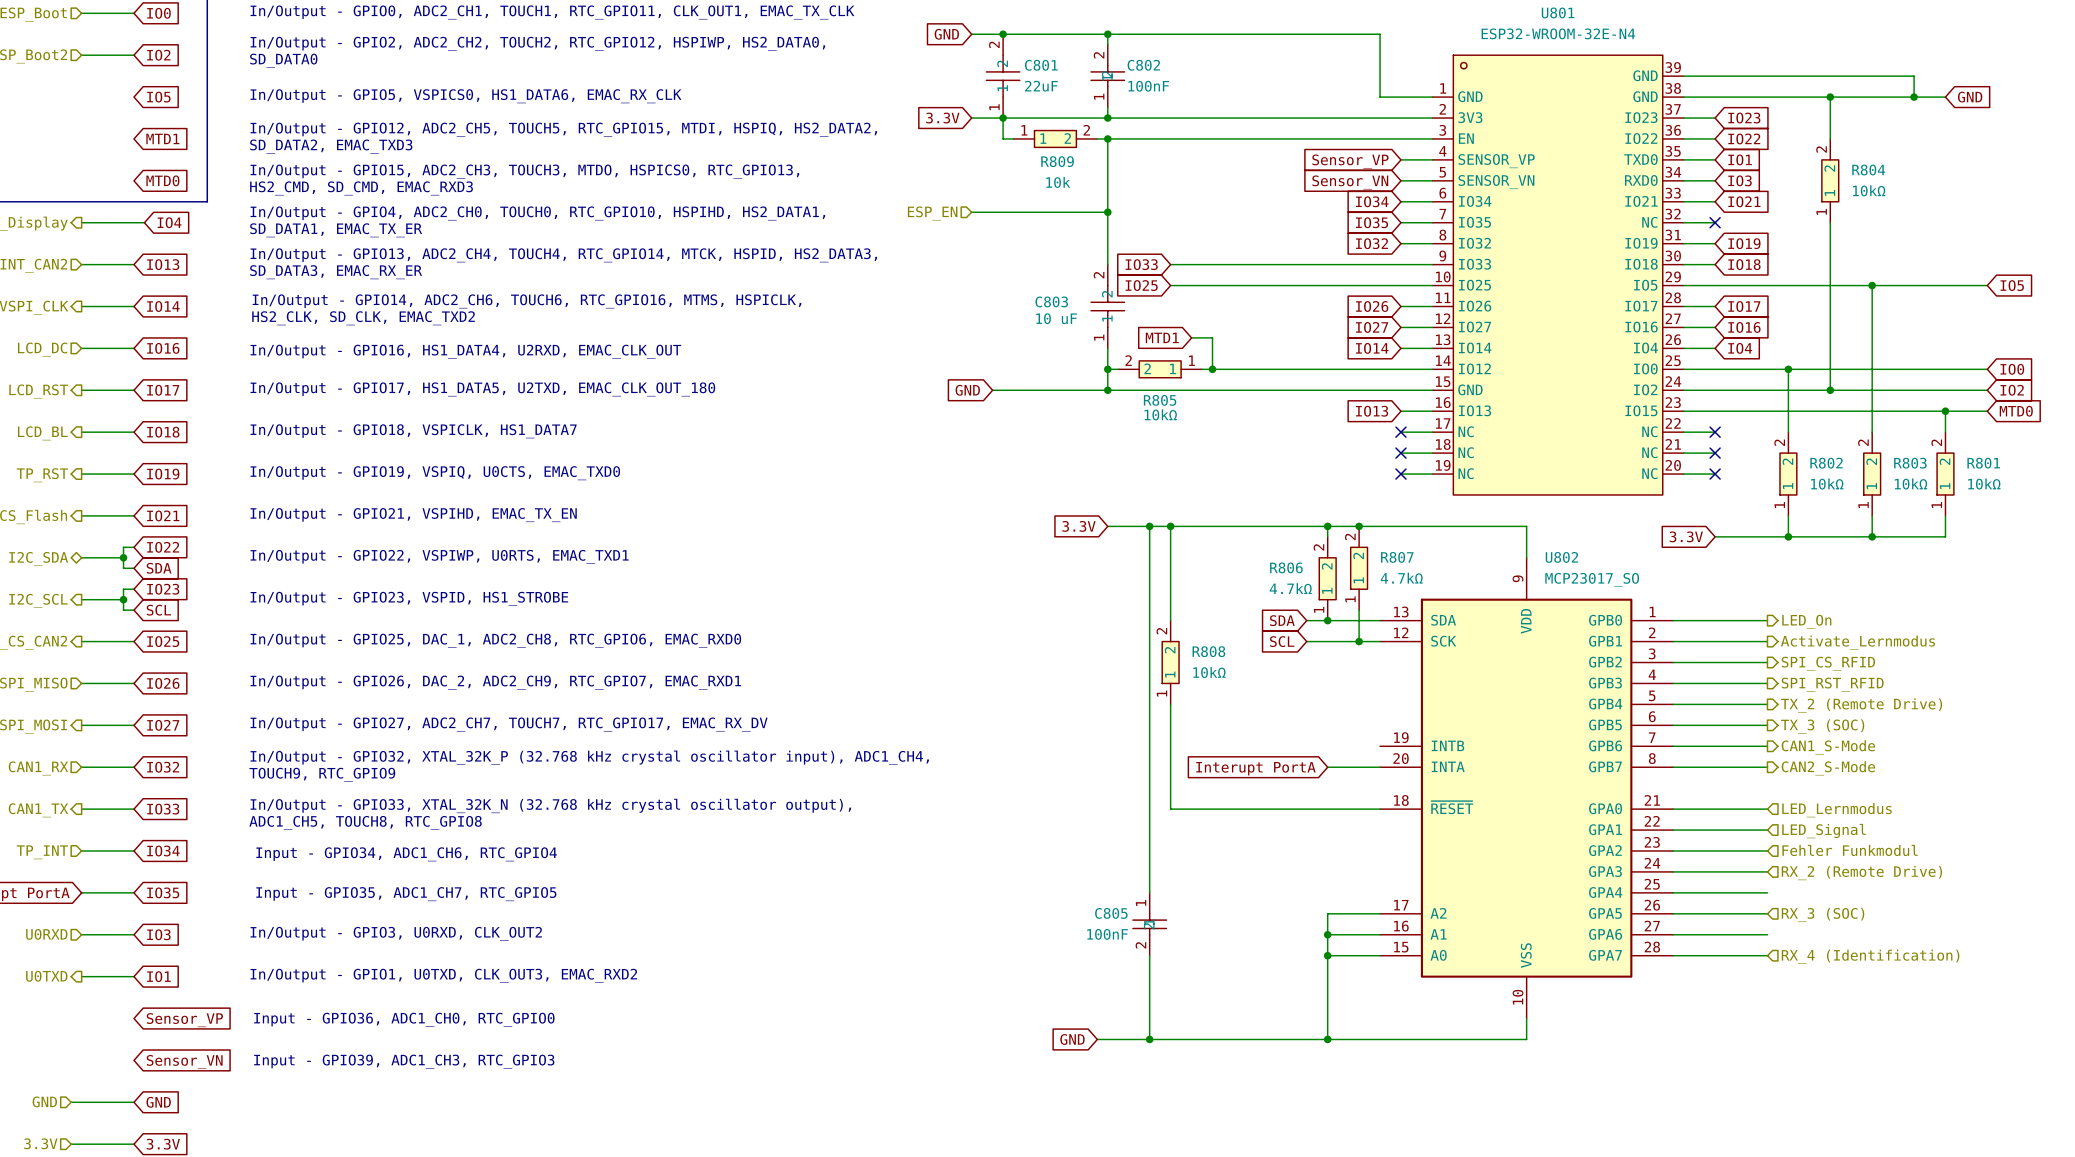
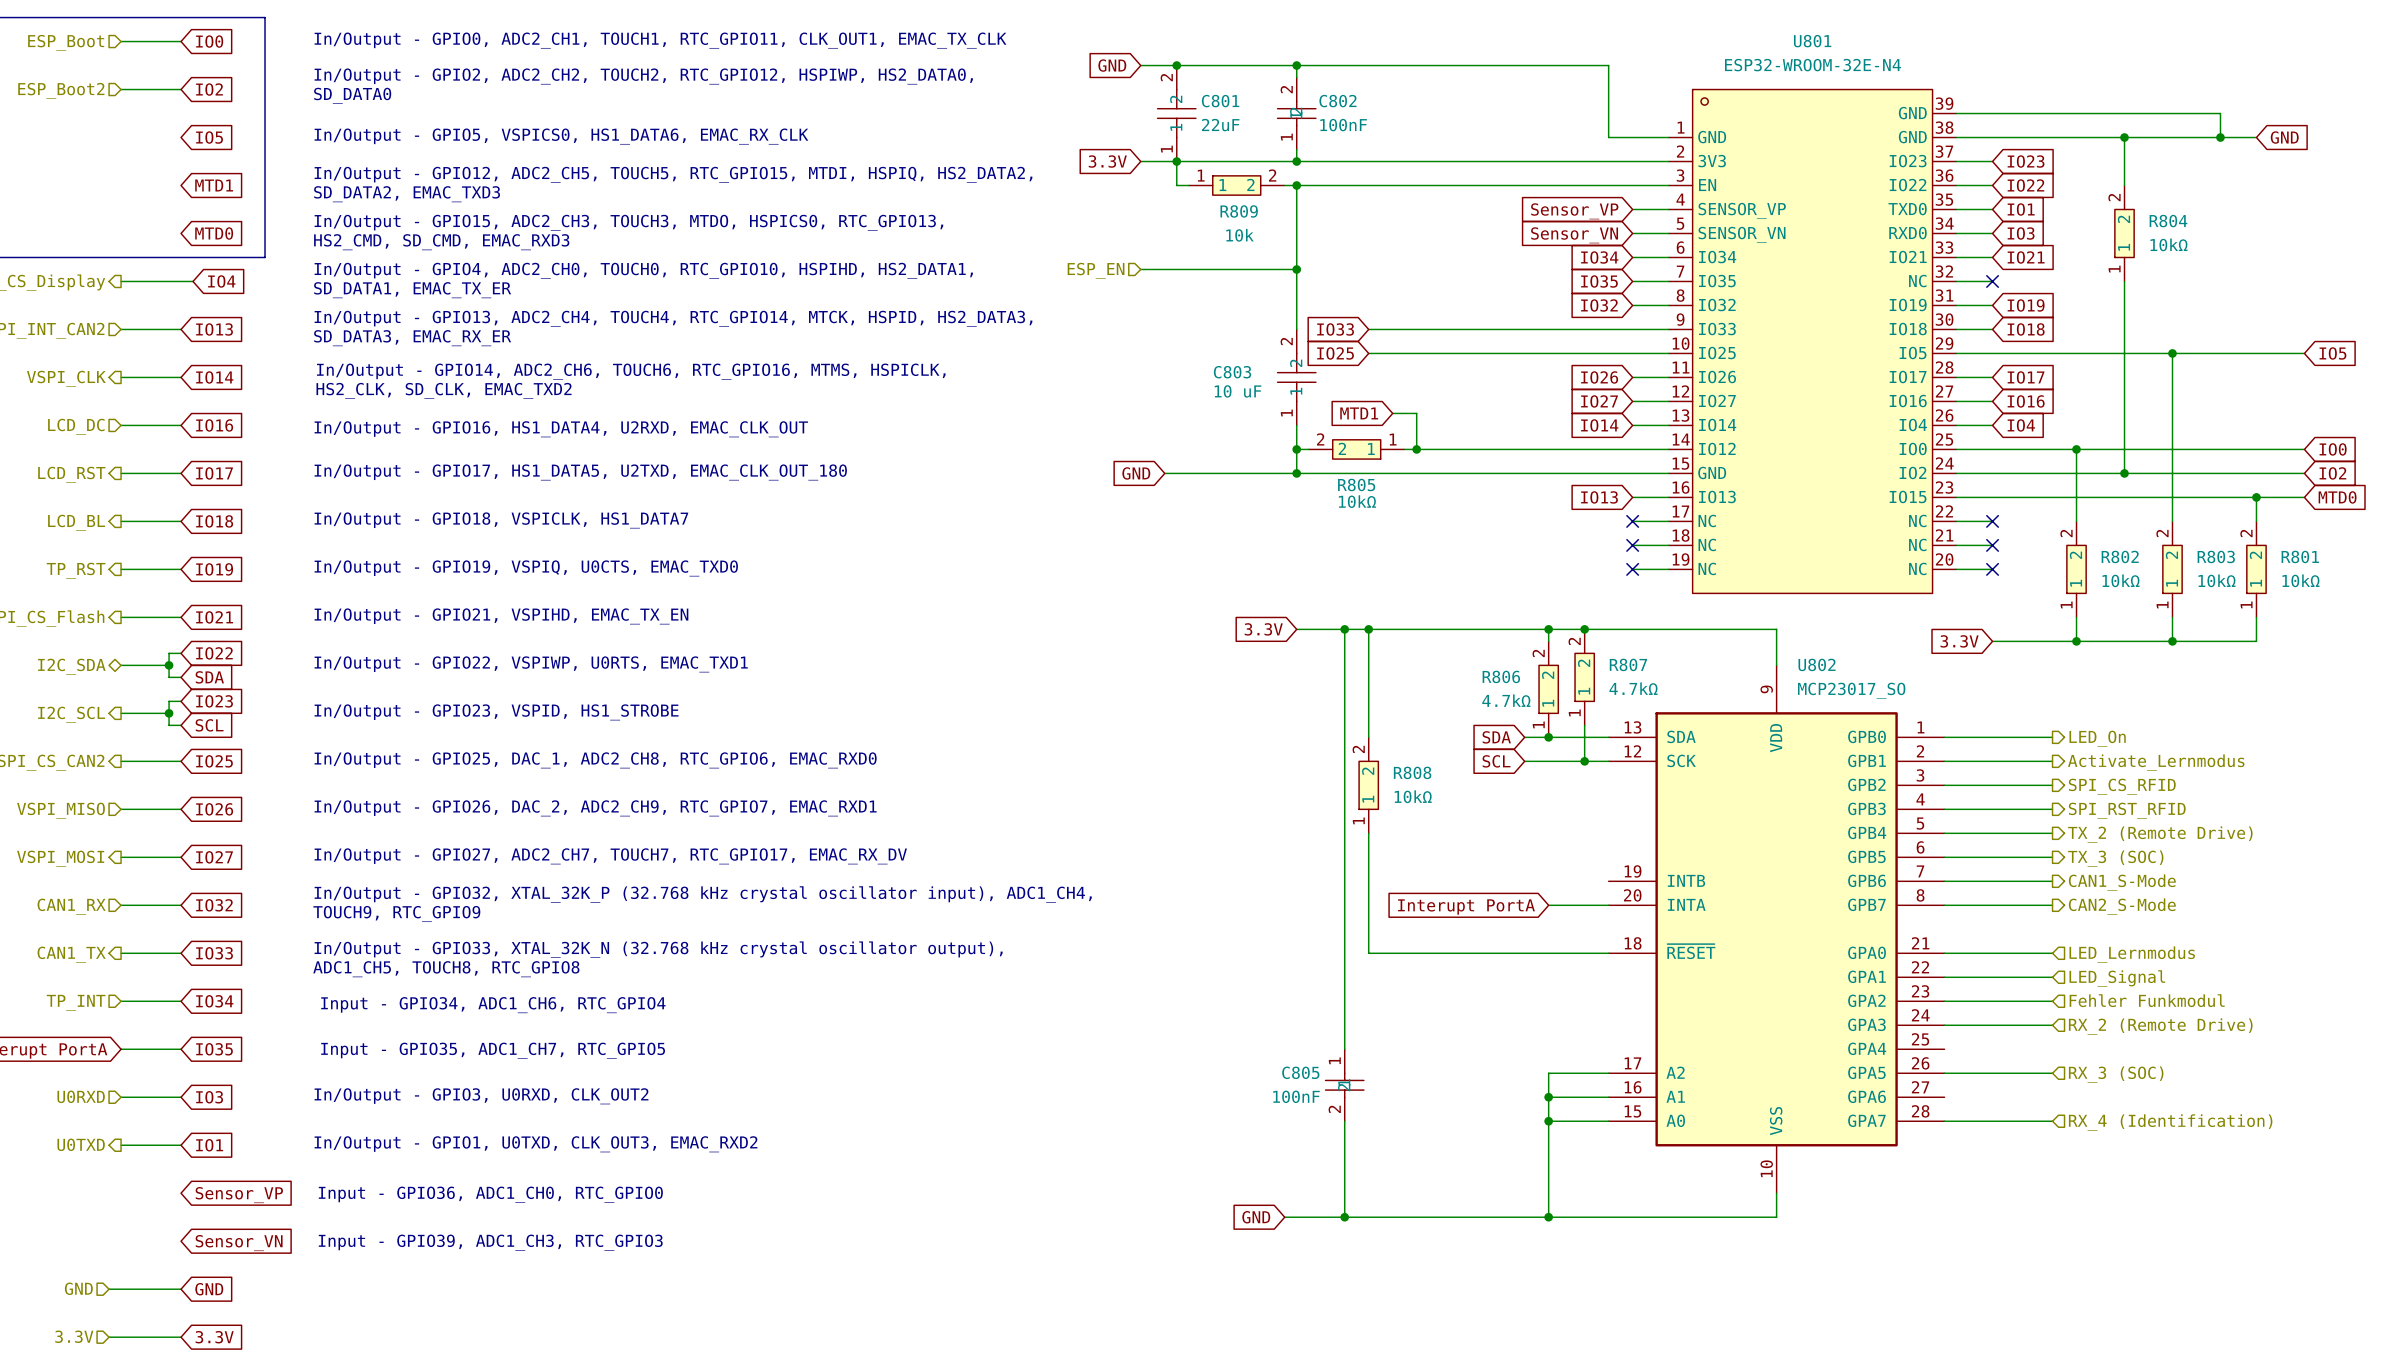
wire: (1673, 892) (1767, 892) -> none
wire: (1673, 934) (1767, 934) -> none

